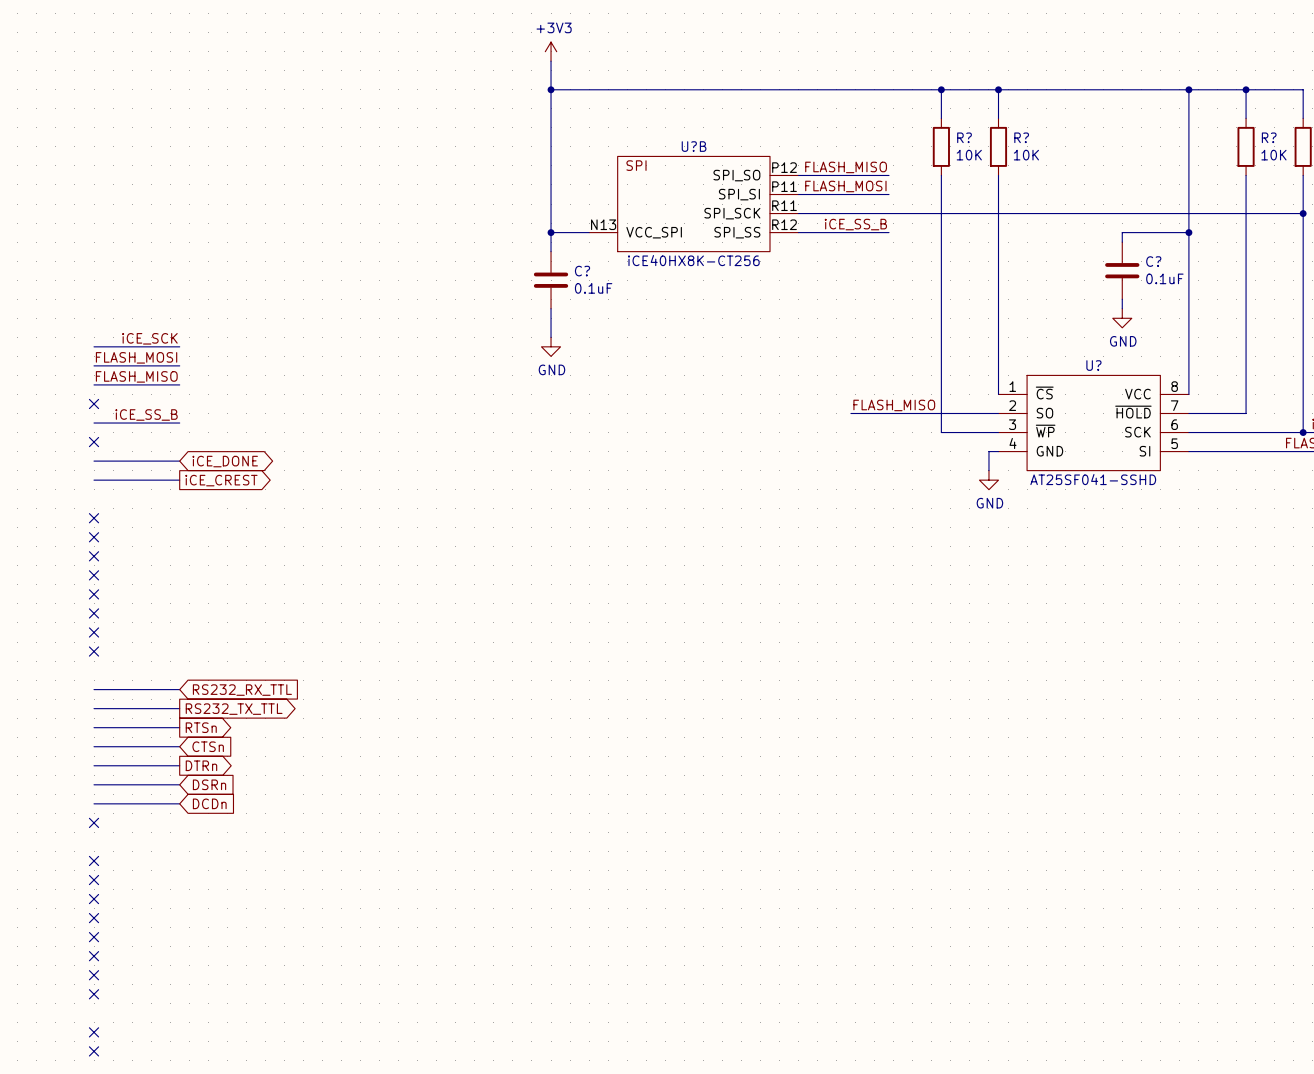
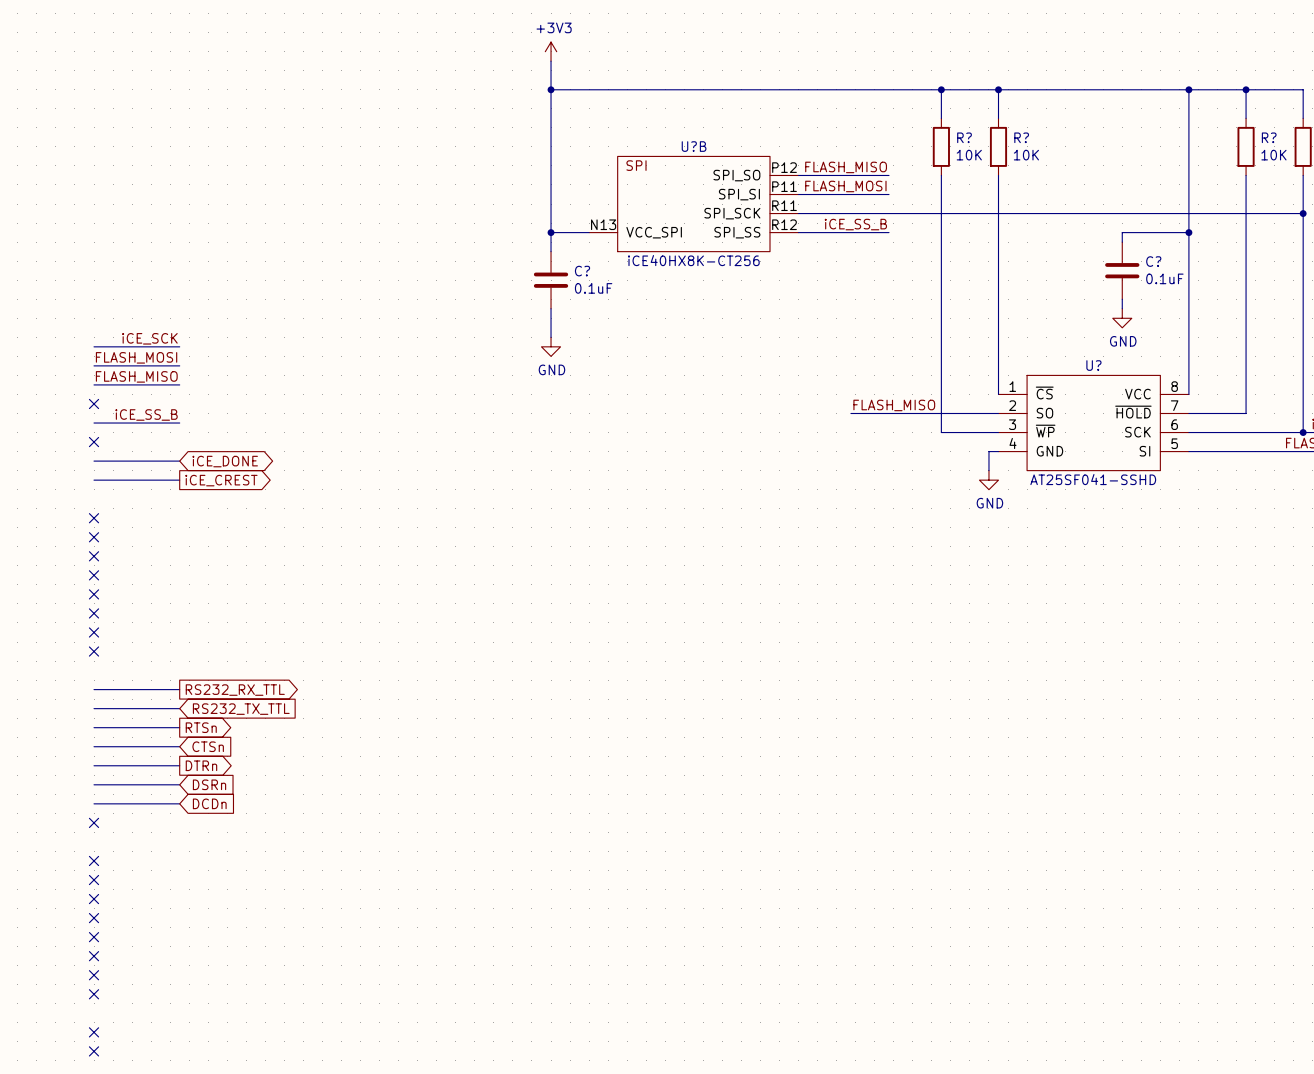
global label shape: input (242, 690) -> output (235, 690)
global label shape: output (234, 709) -> input (241, 709)

